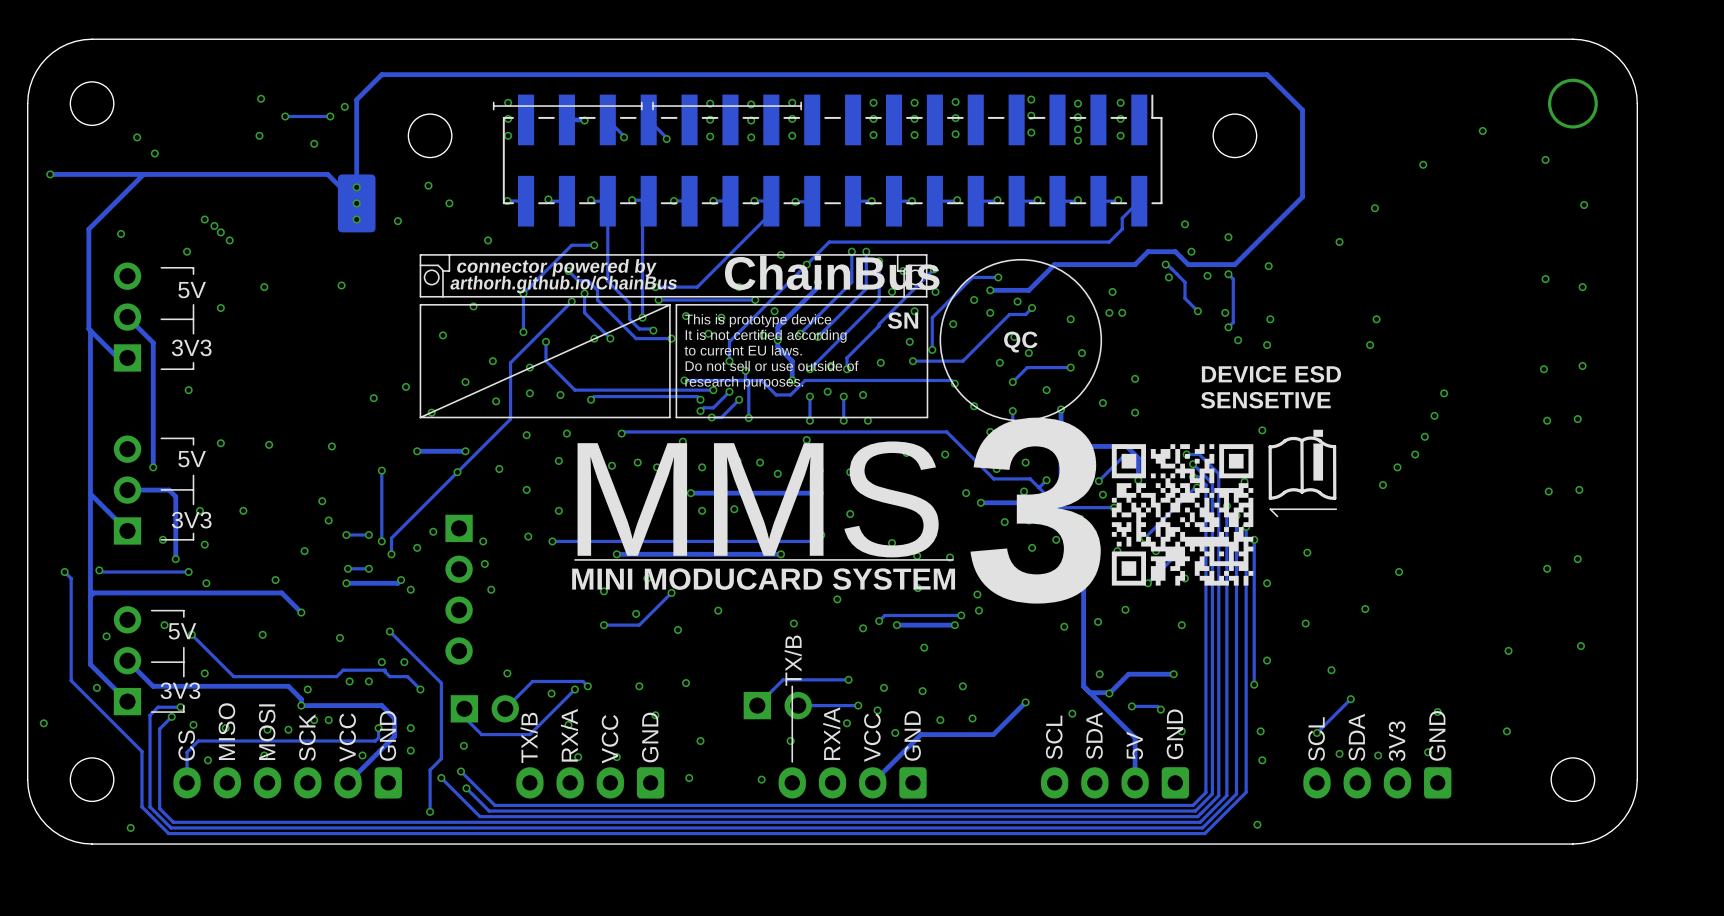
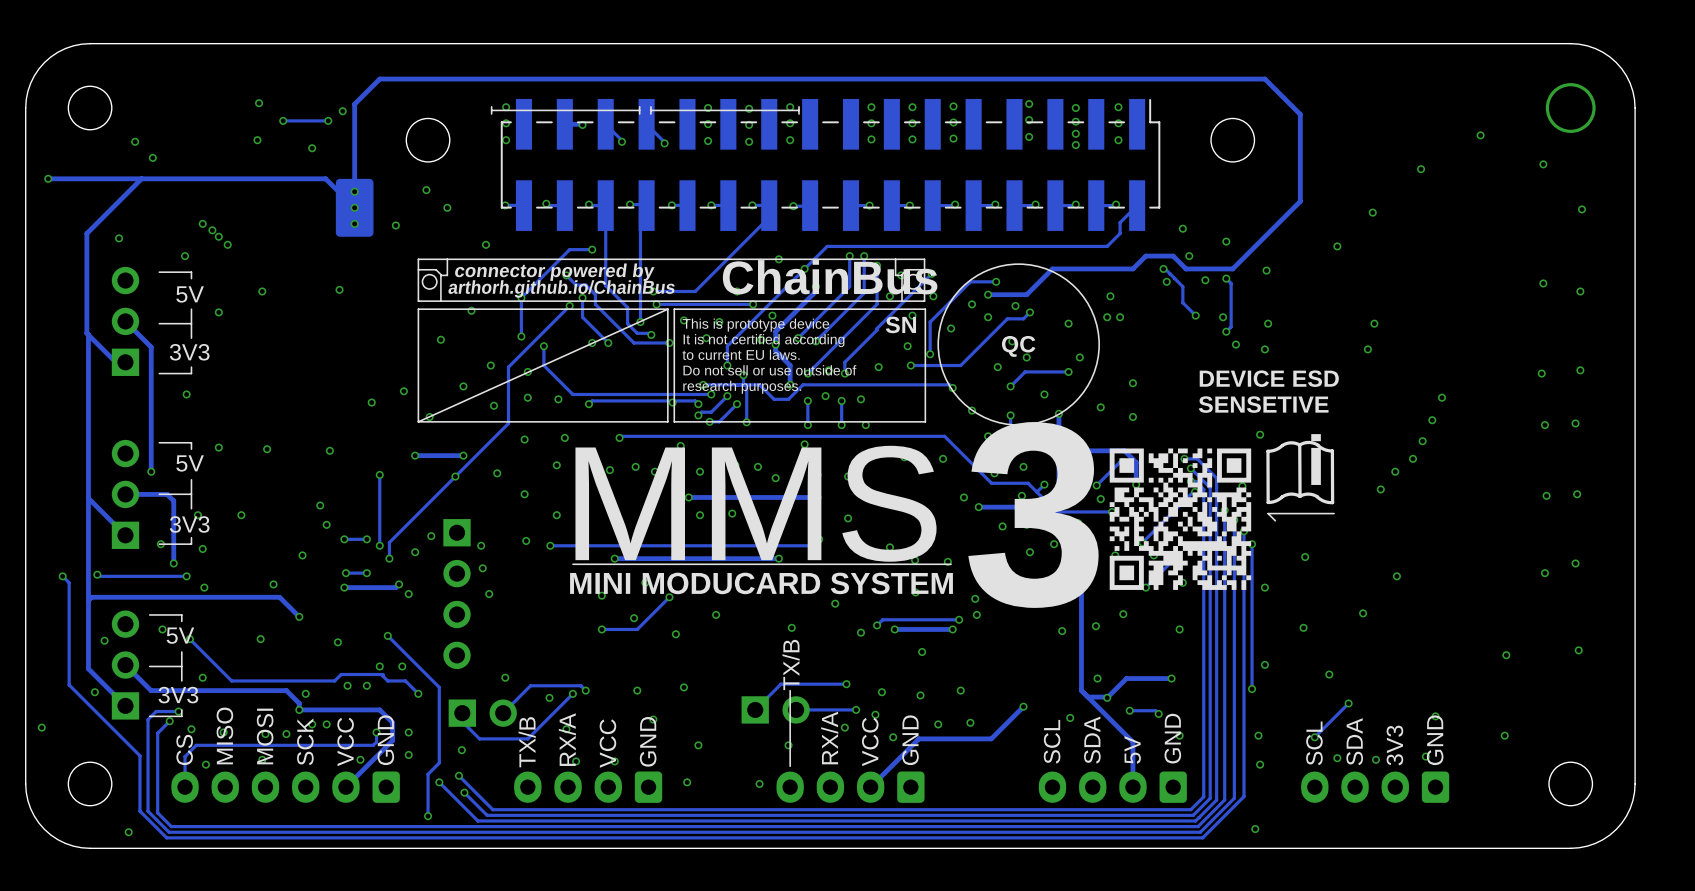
via: (684, 380) -> none
track: (705, 380) (684, 380) -> none
via: none -> (703, 384)
via: none -> (672, 402)

